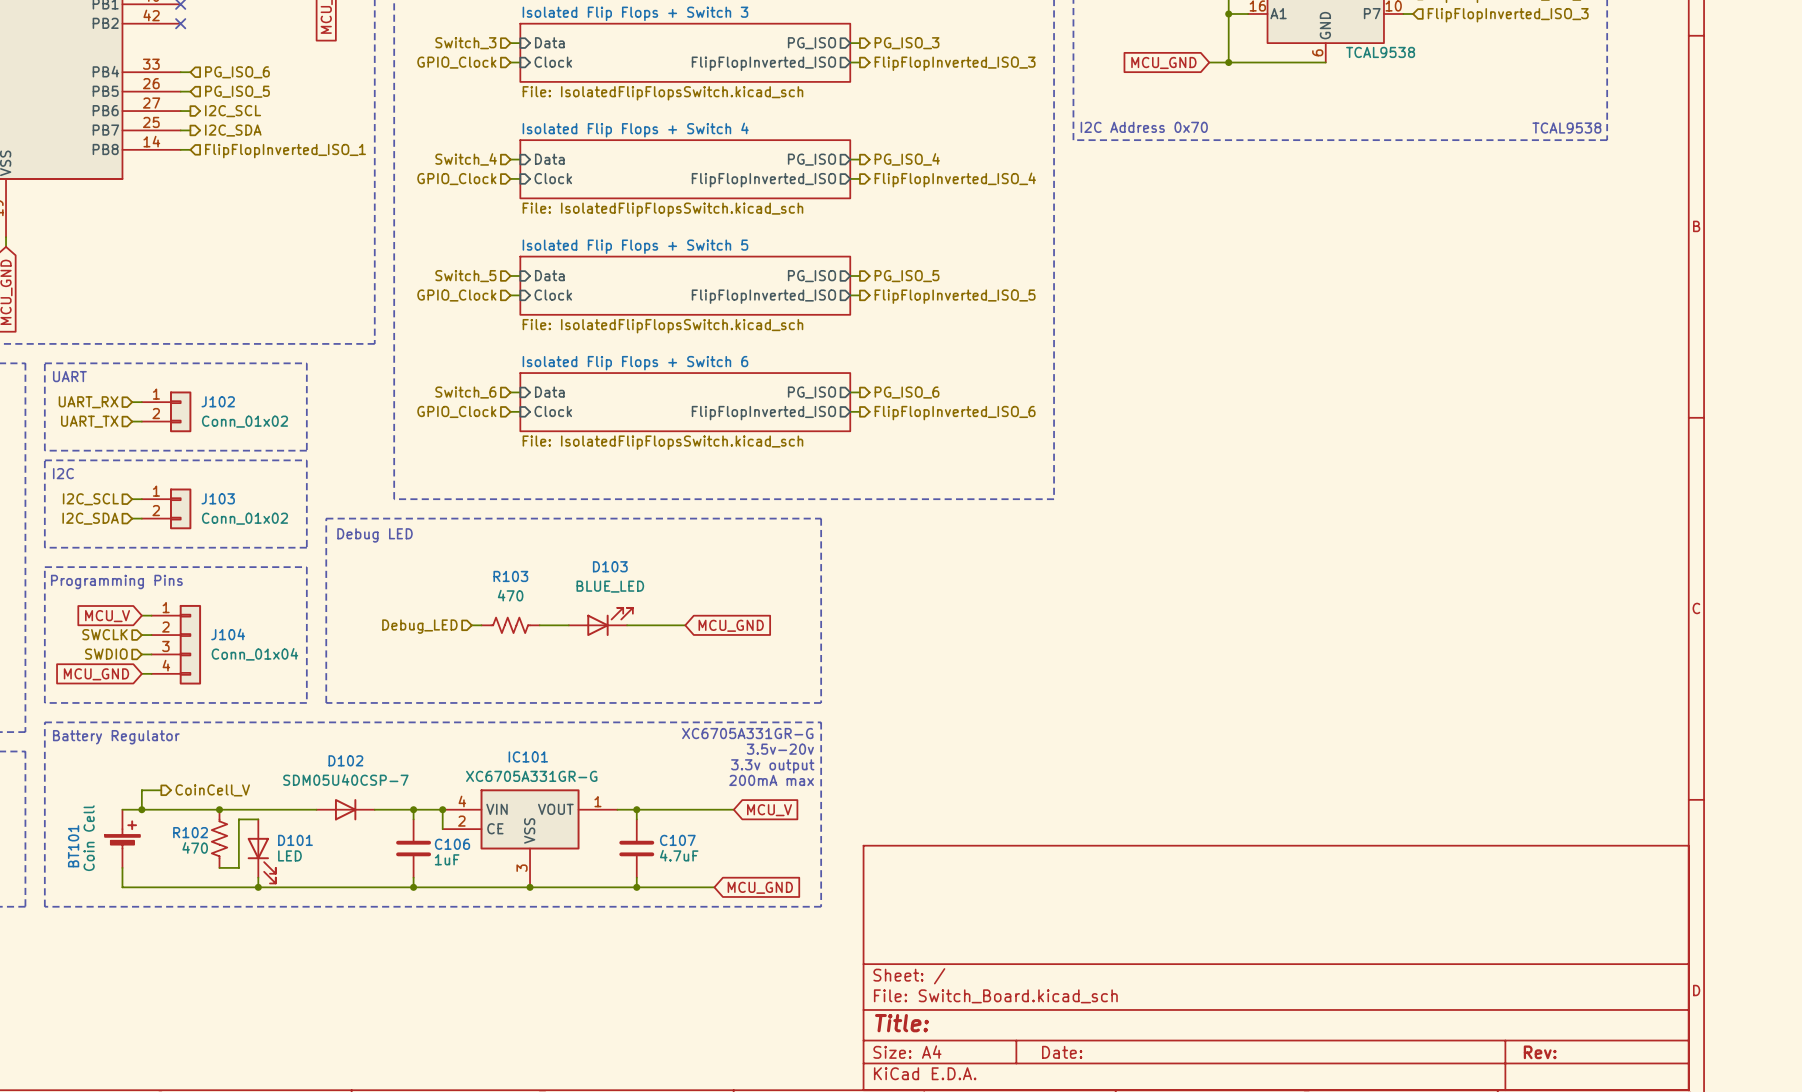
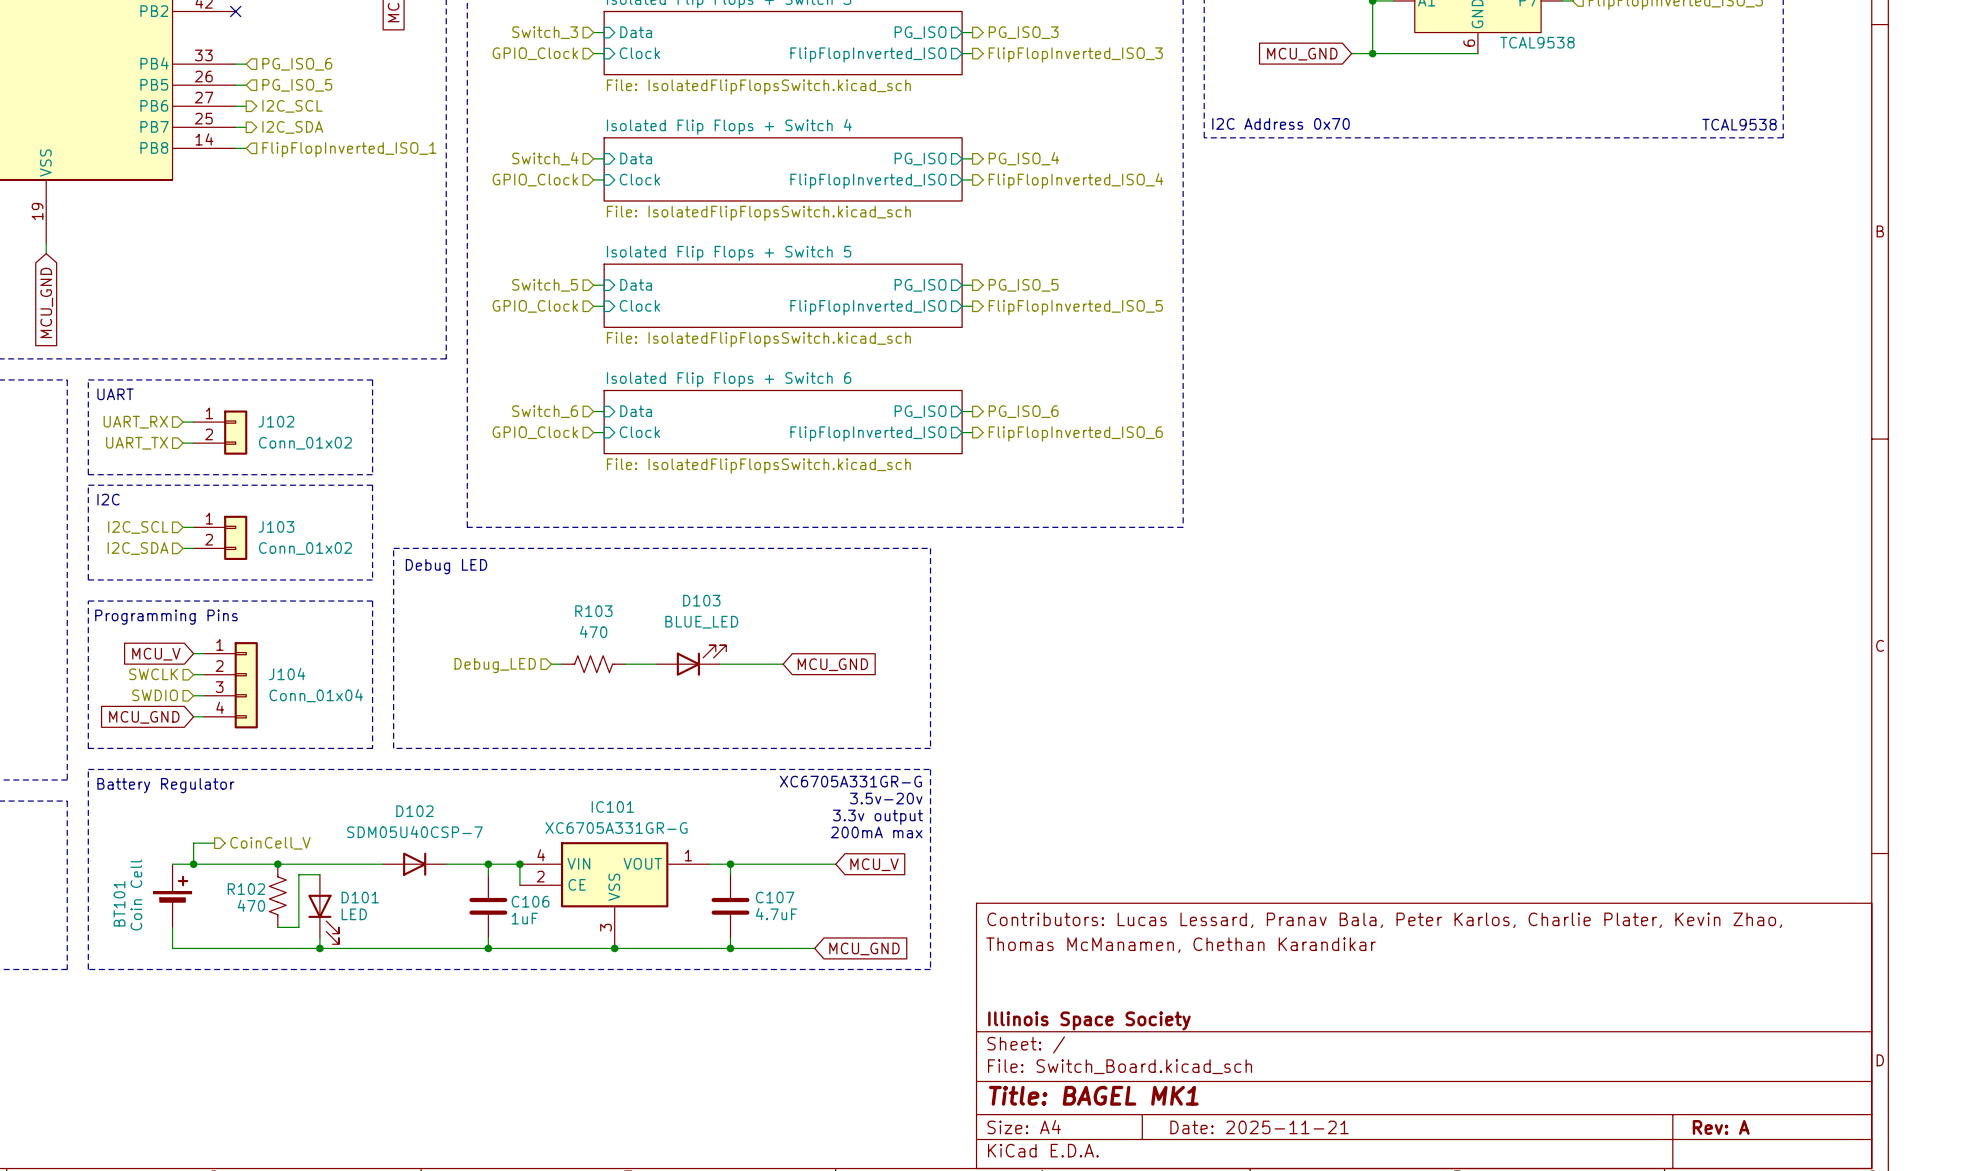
title block: none -> Contributors: Lucas Lessard, Pranav Bala, Peter Karlos, Charlie Plater, Kevin Zhao, (1384, 920)
title block: none -> Thomas McManamen, Chethan Karandikar (1181, 945)
title block: none -> Illinois Space Society (1089, 1020)
title block: Title: (901, 1023) -> Title: BAGEL MK1 (1093, 1095)
title block: Date: (1062, 1052) -> Date: 2025-11-21 (1259, 1127)
title block: Rev: (1540, 1052) -> Rev: A (1721, 1127)

